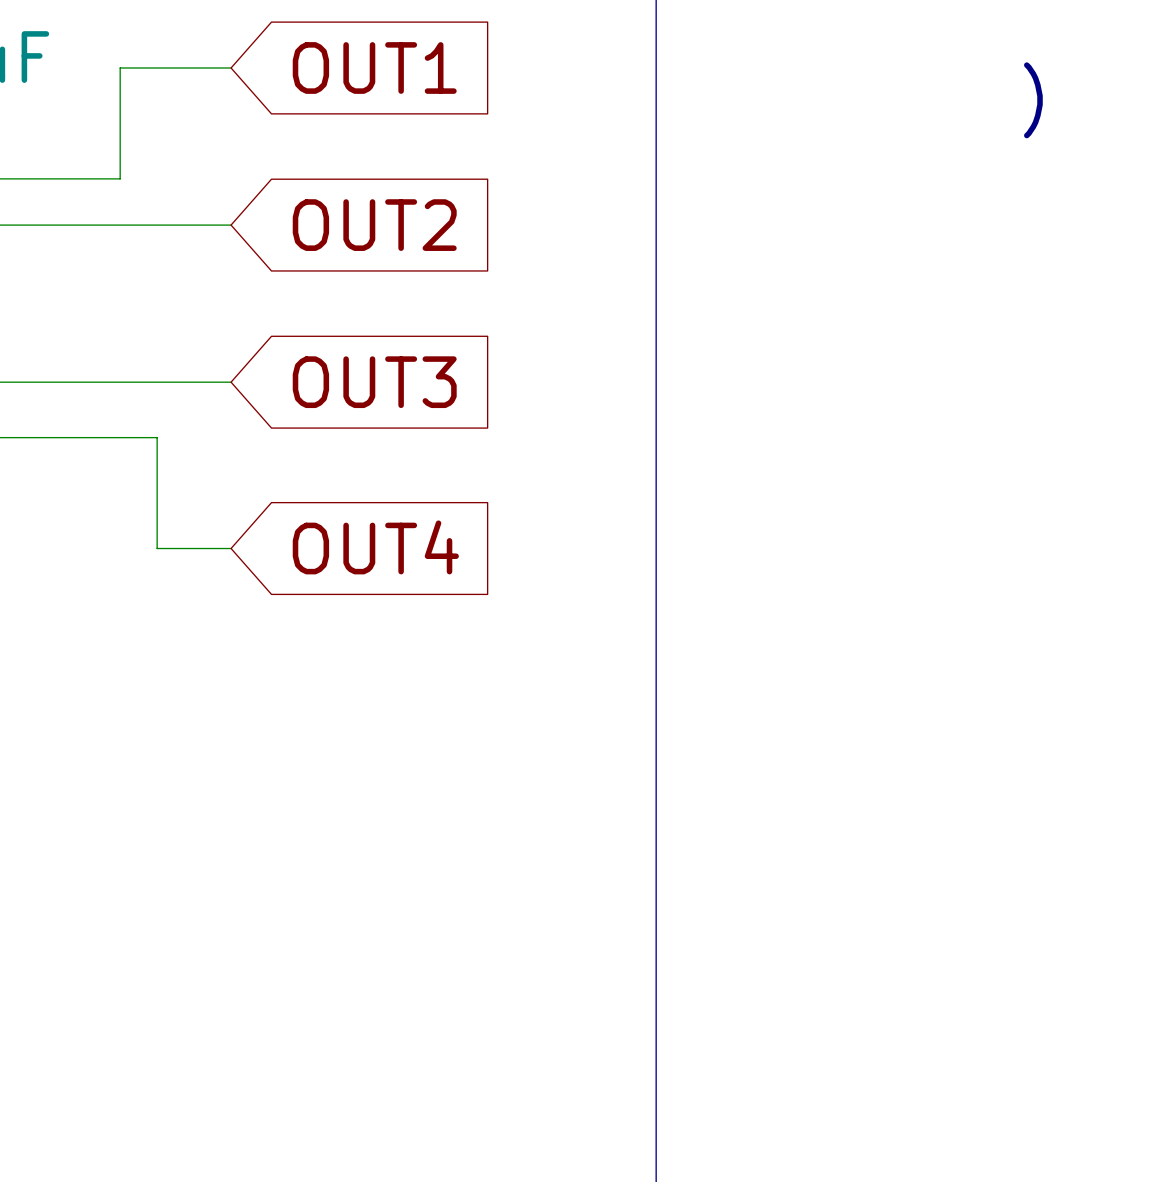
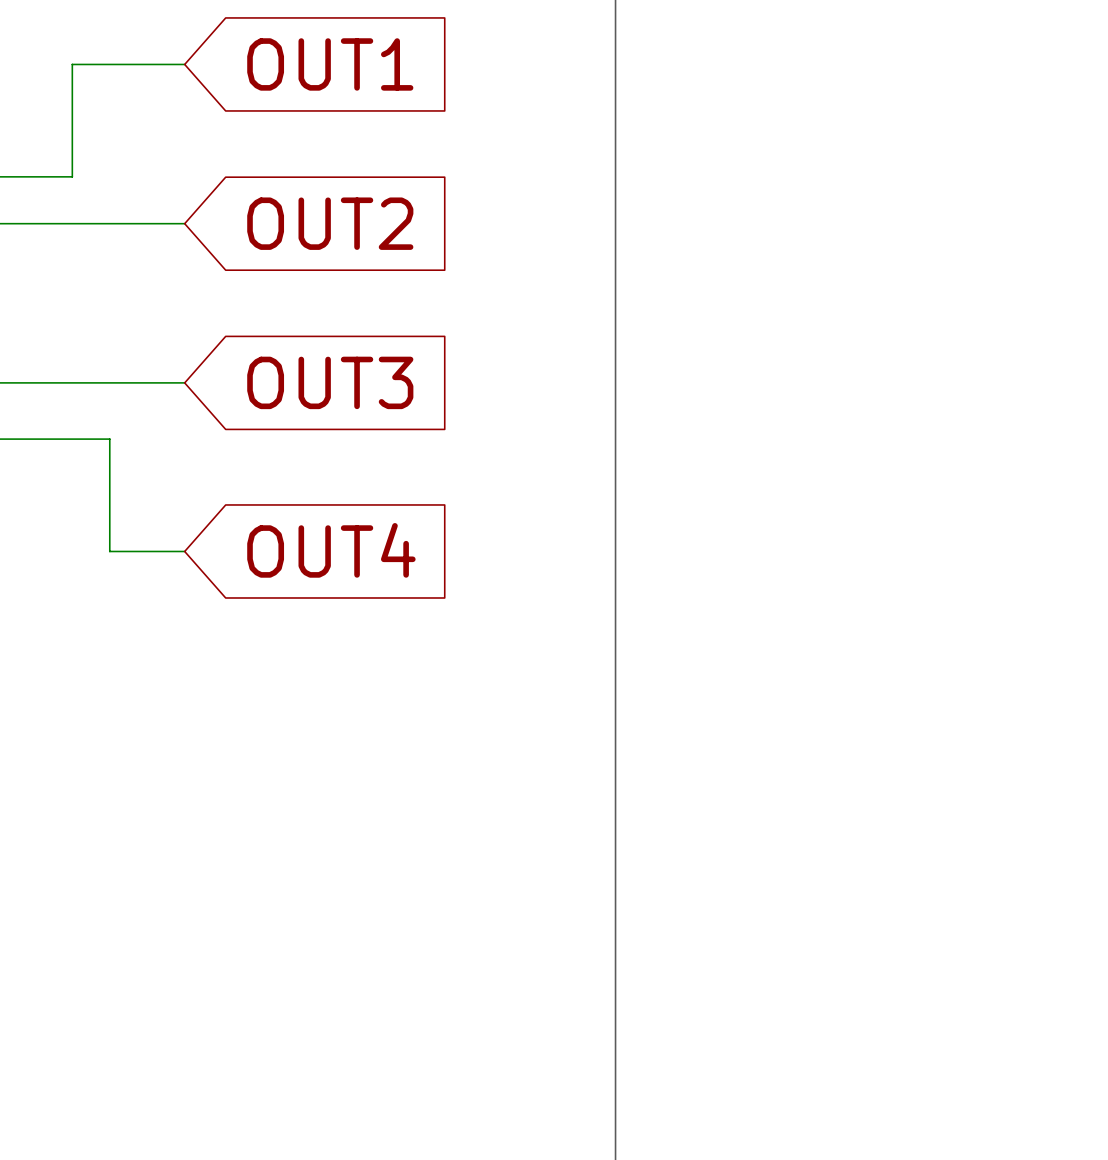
text: ) (1033, 100) -> none

